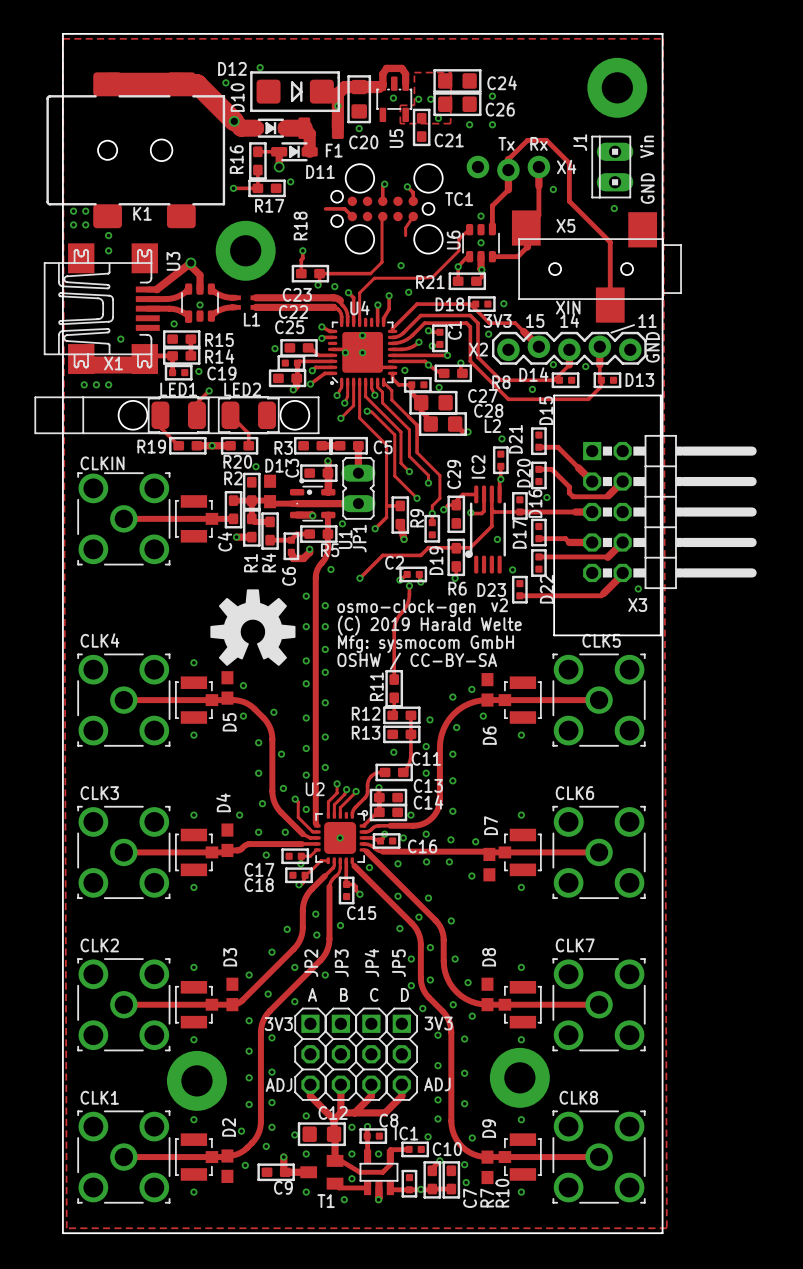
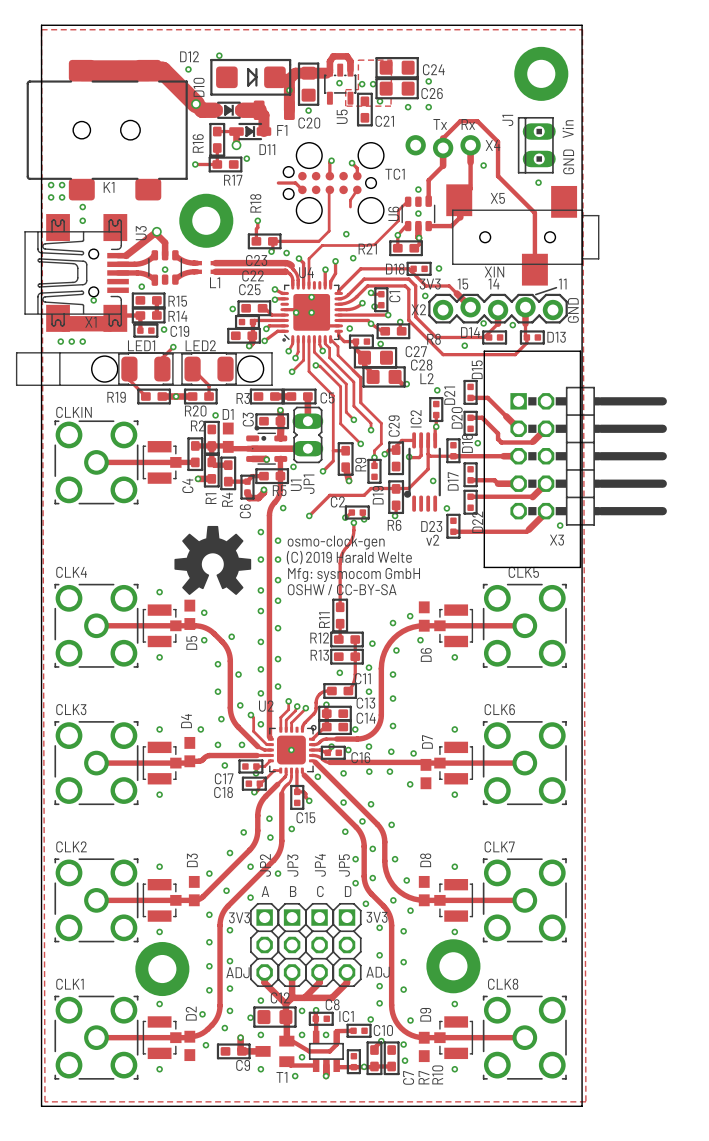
X1 footprint: [44, 243, 160, 375] -> [24, 214, 129, 332]

